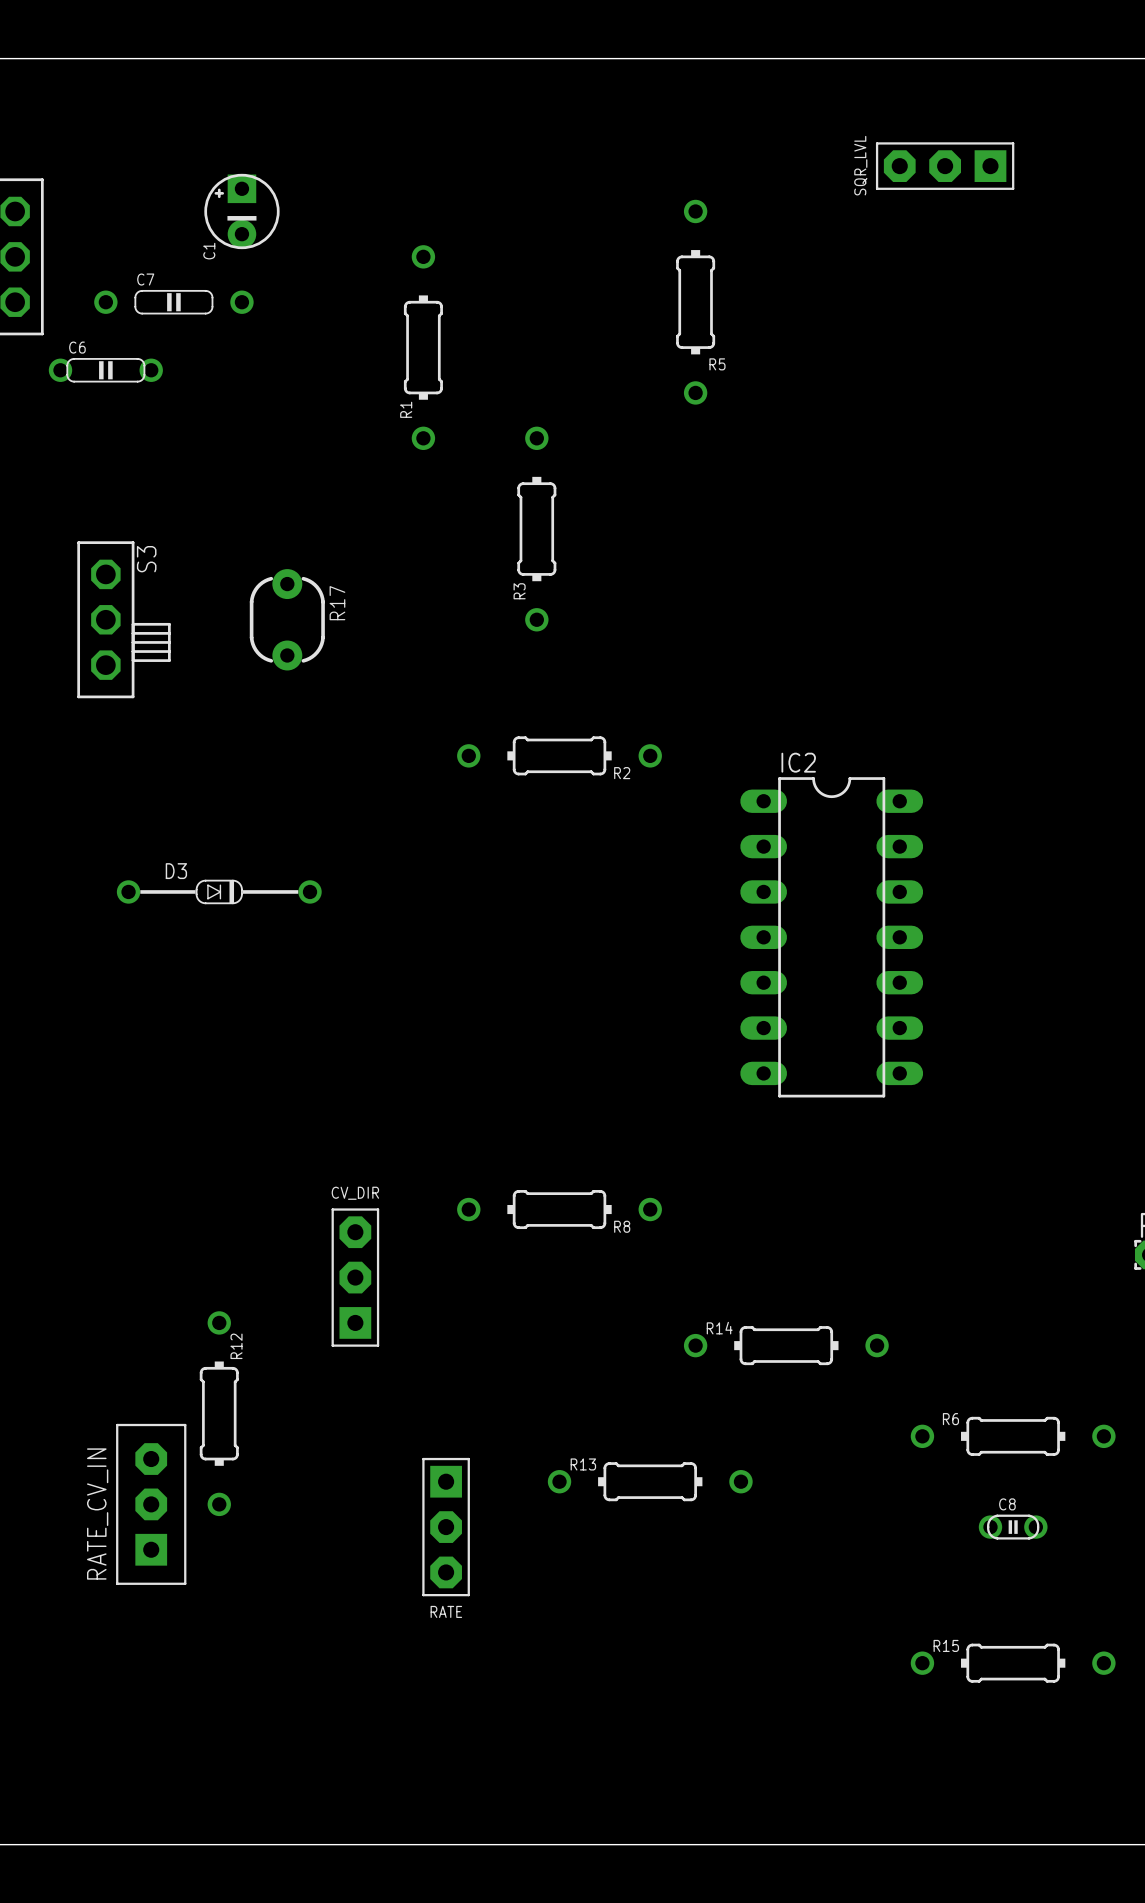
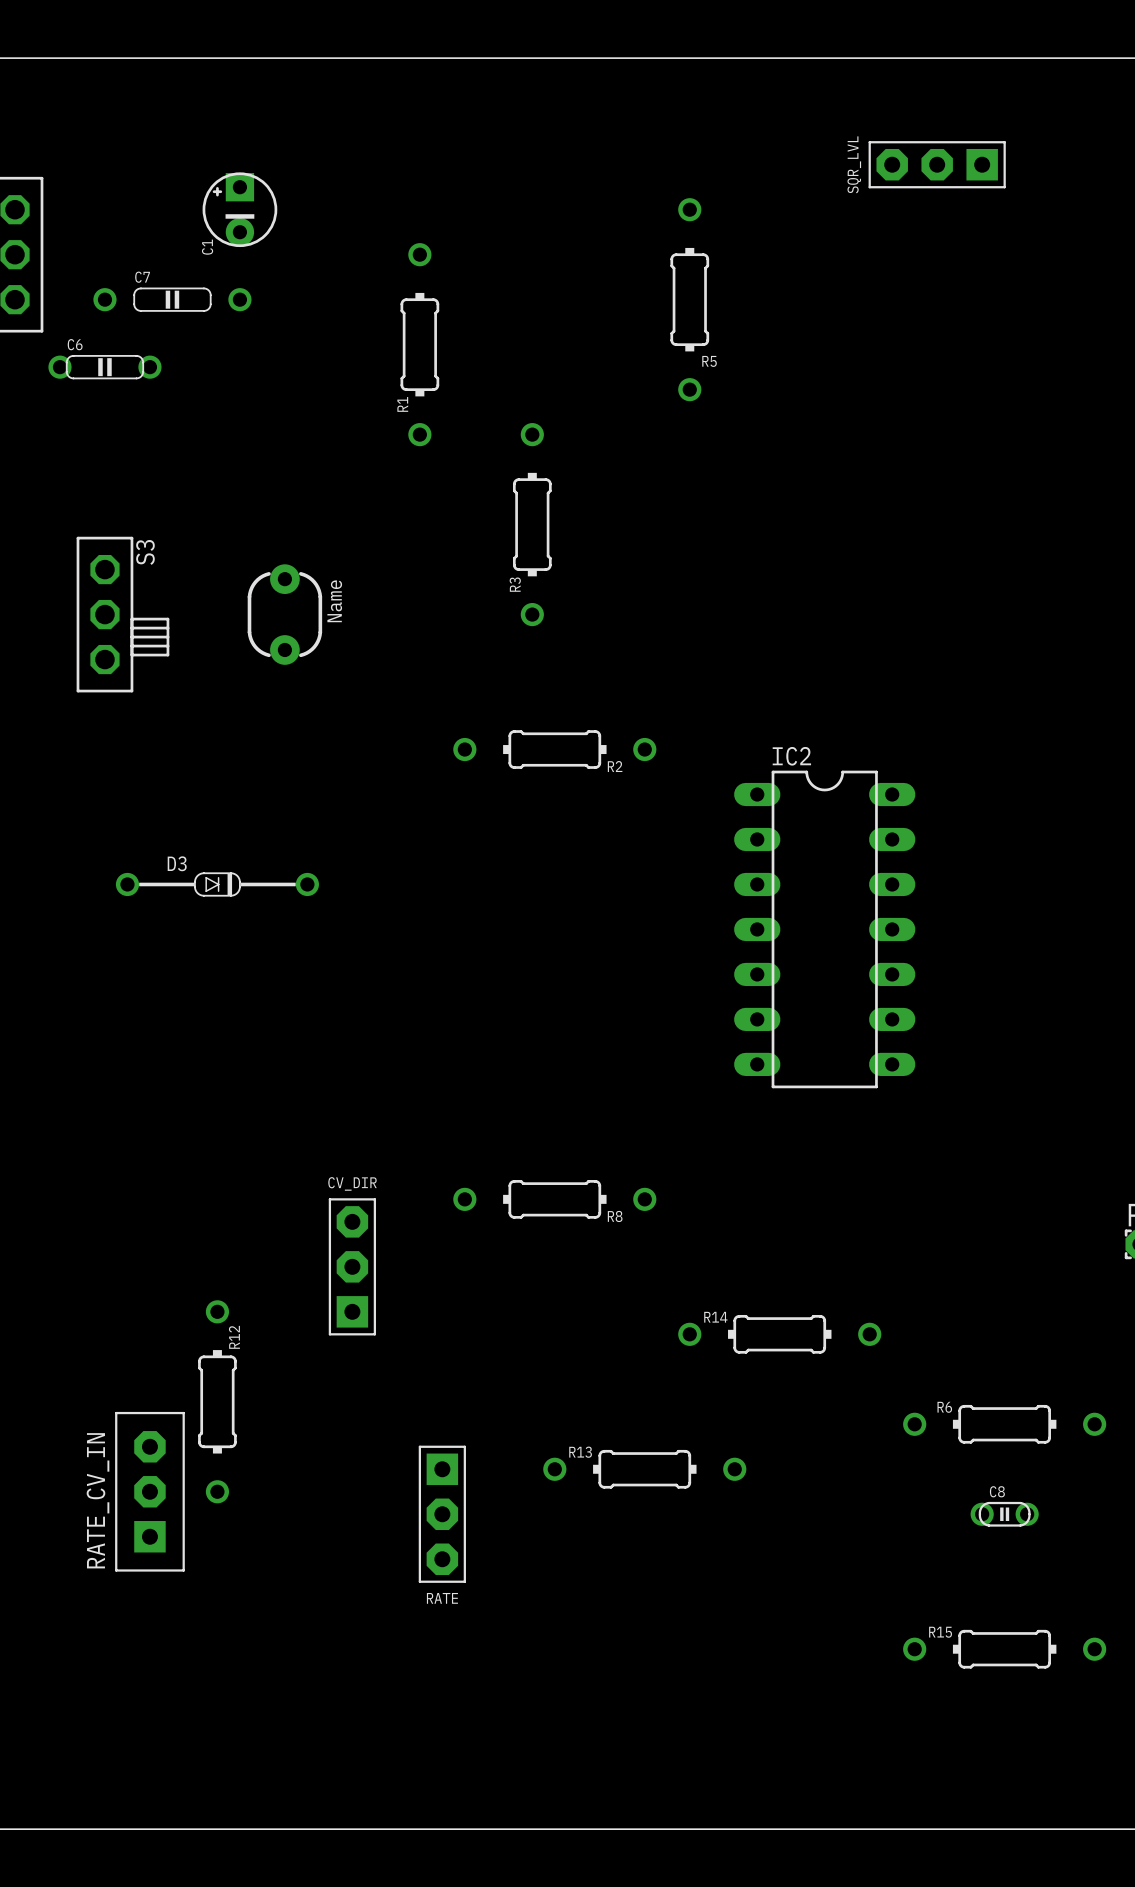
R17 name: R17 (337, 603) -> none
R17 text: none -> Name (334, 601)

